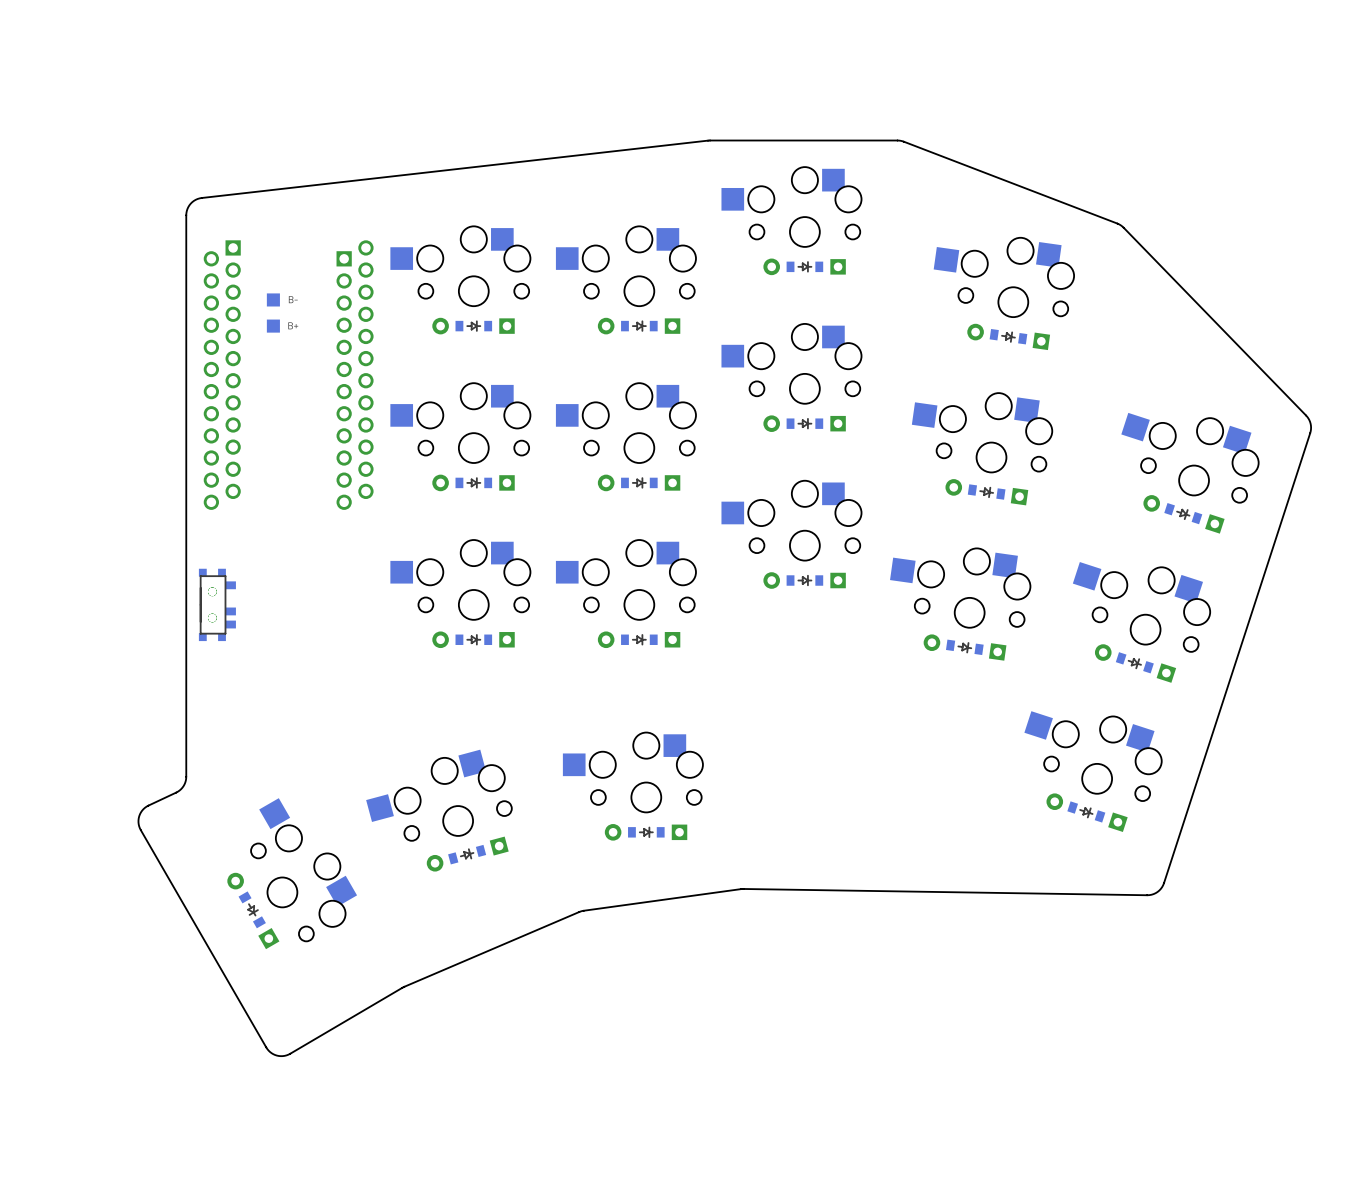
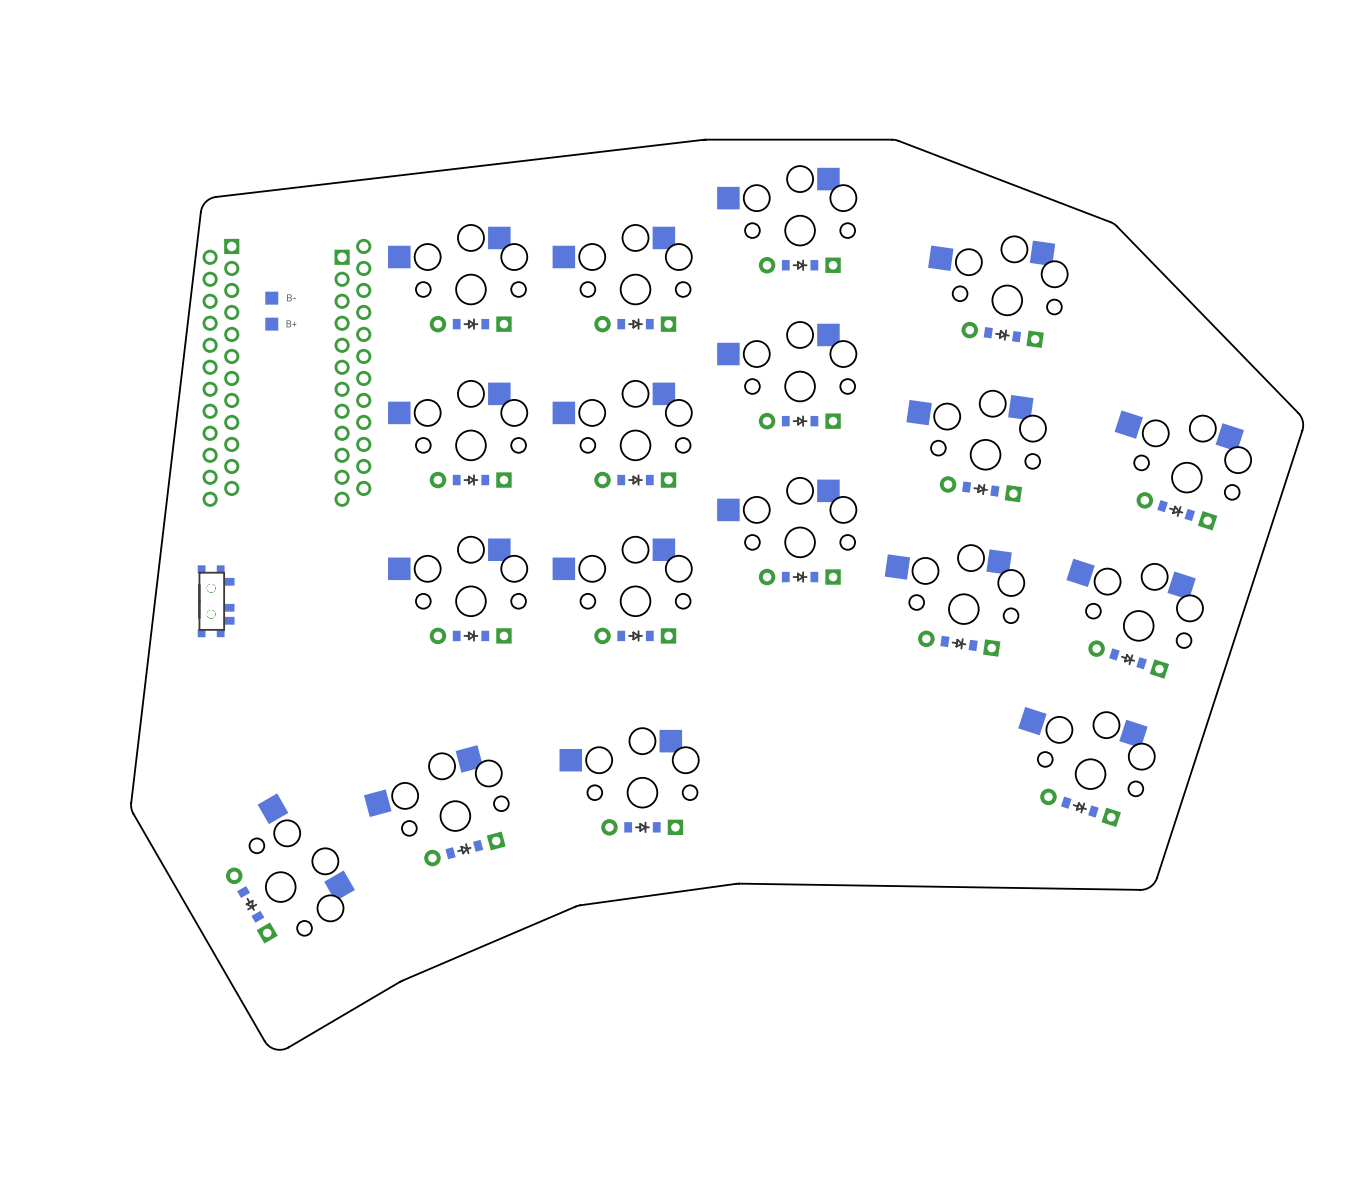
board edge: (710, 140) (201, 198) (190, 203) (186, 215) (186, 778) (179, 790) (143, 809) (138, 820) (140, 830) -> (705, 139) (216, 196) (204, 203) (200, 212) (131, 803) (132, 812) (139, 825)

